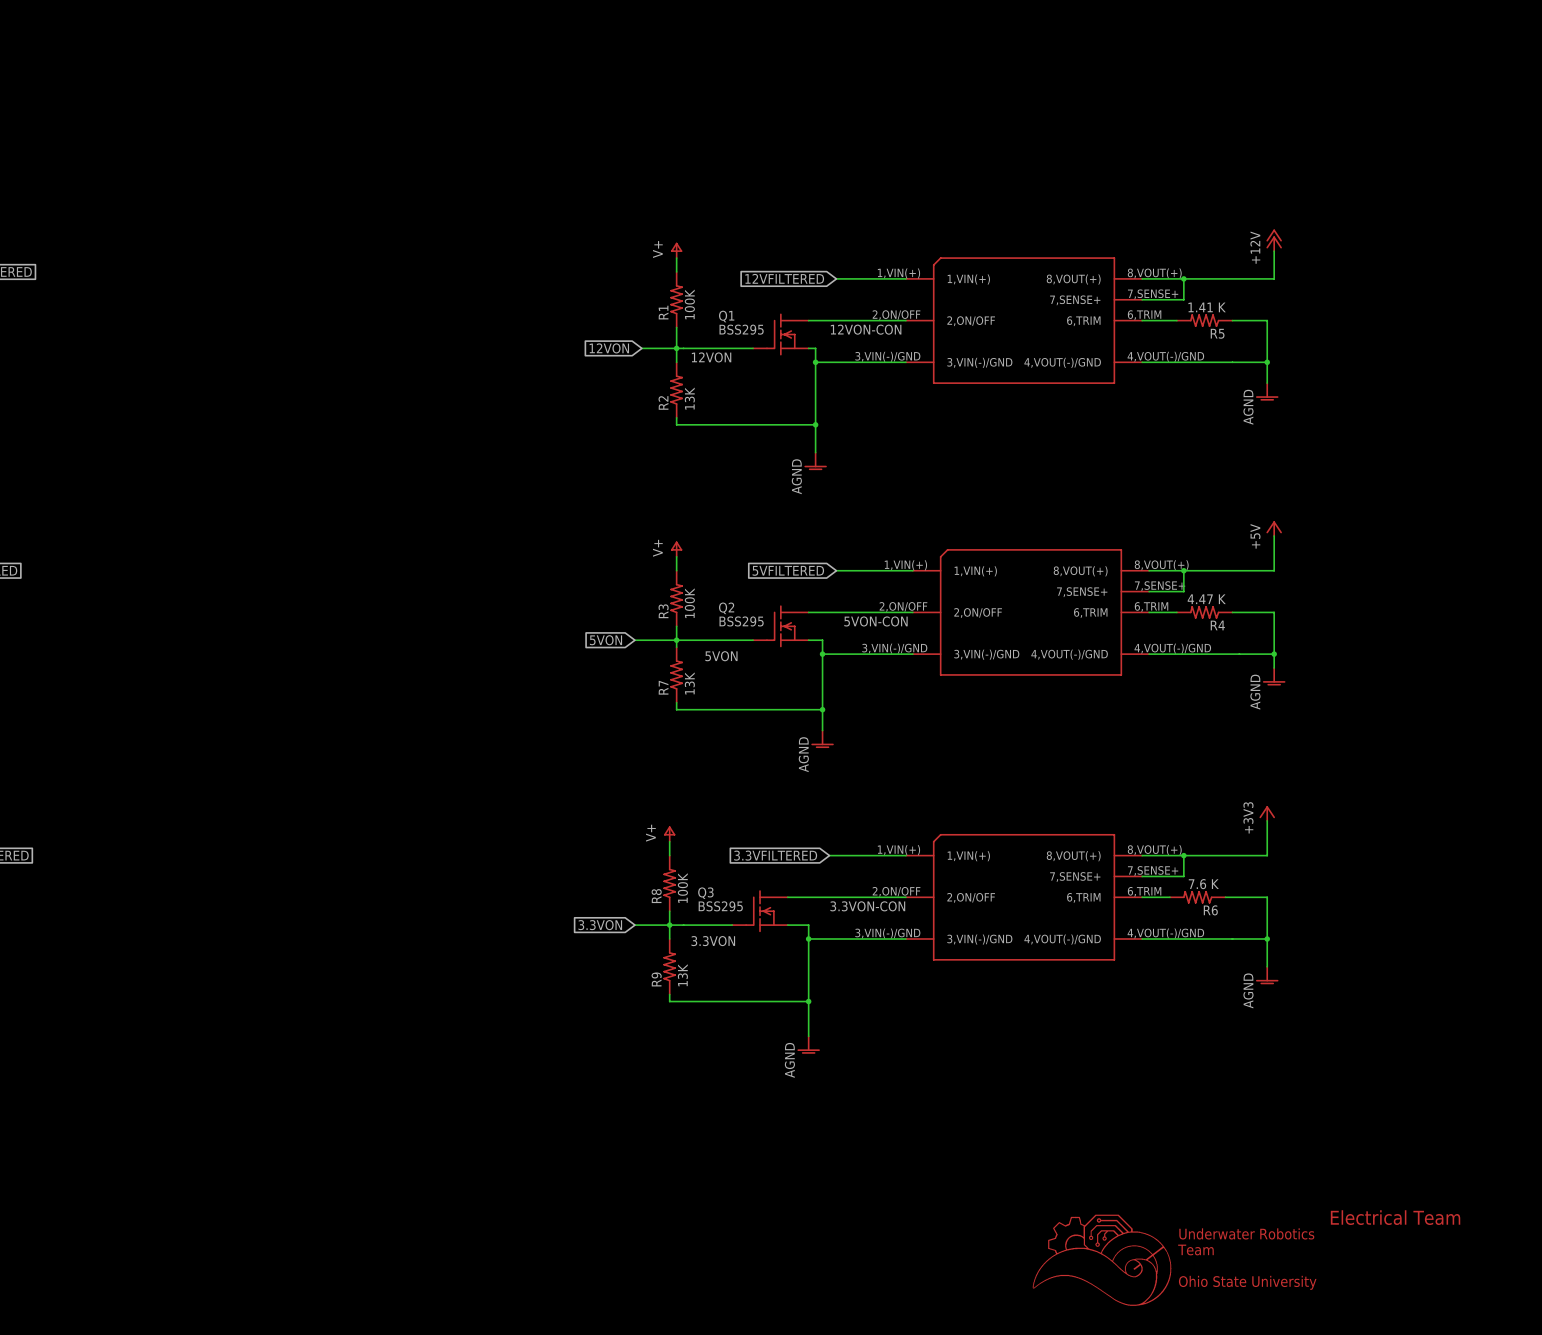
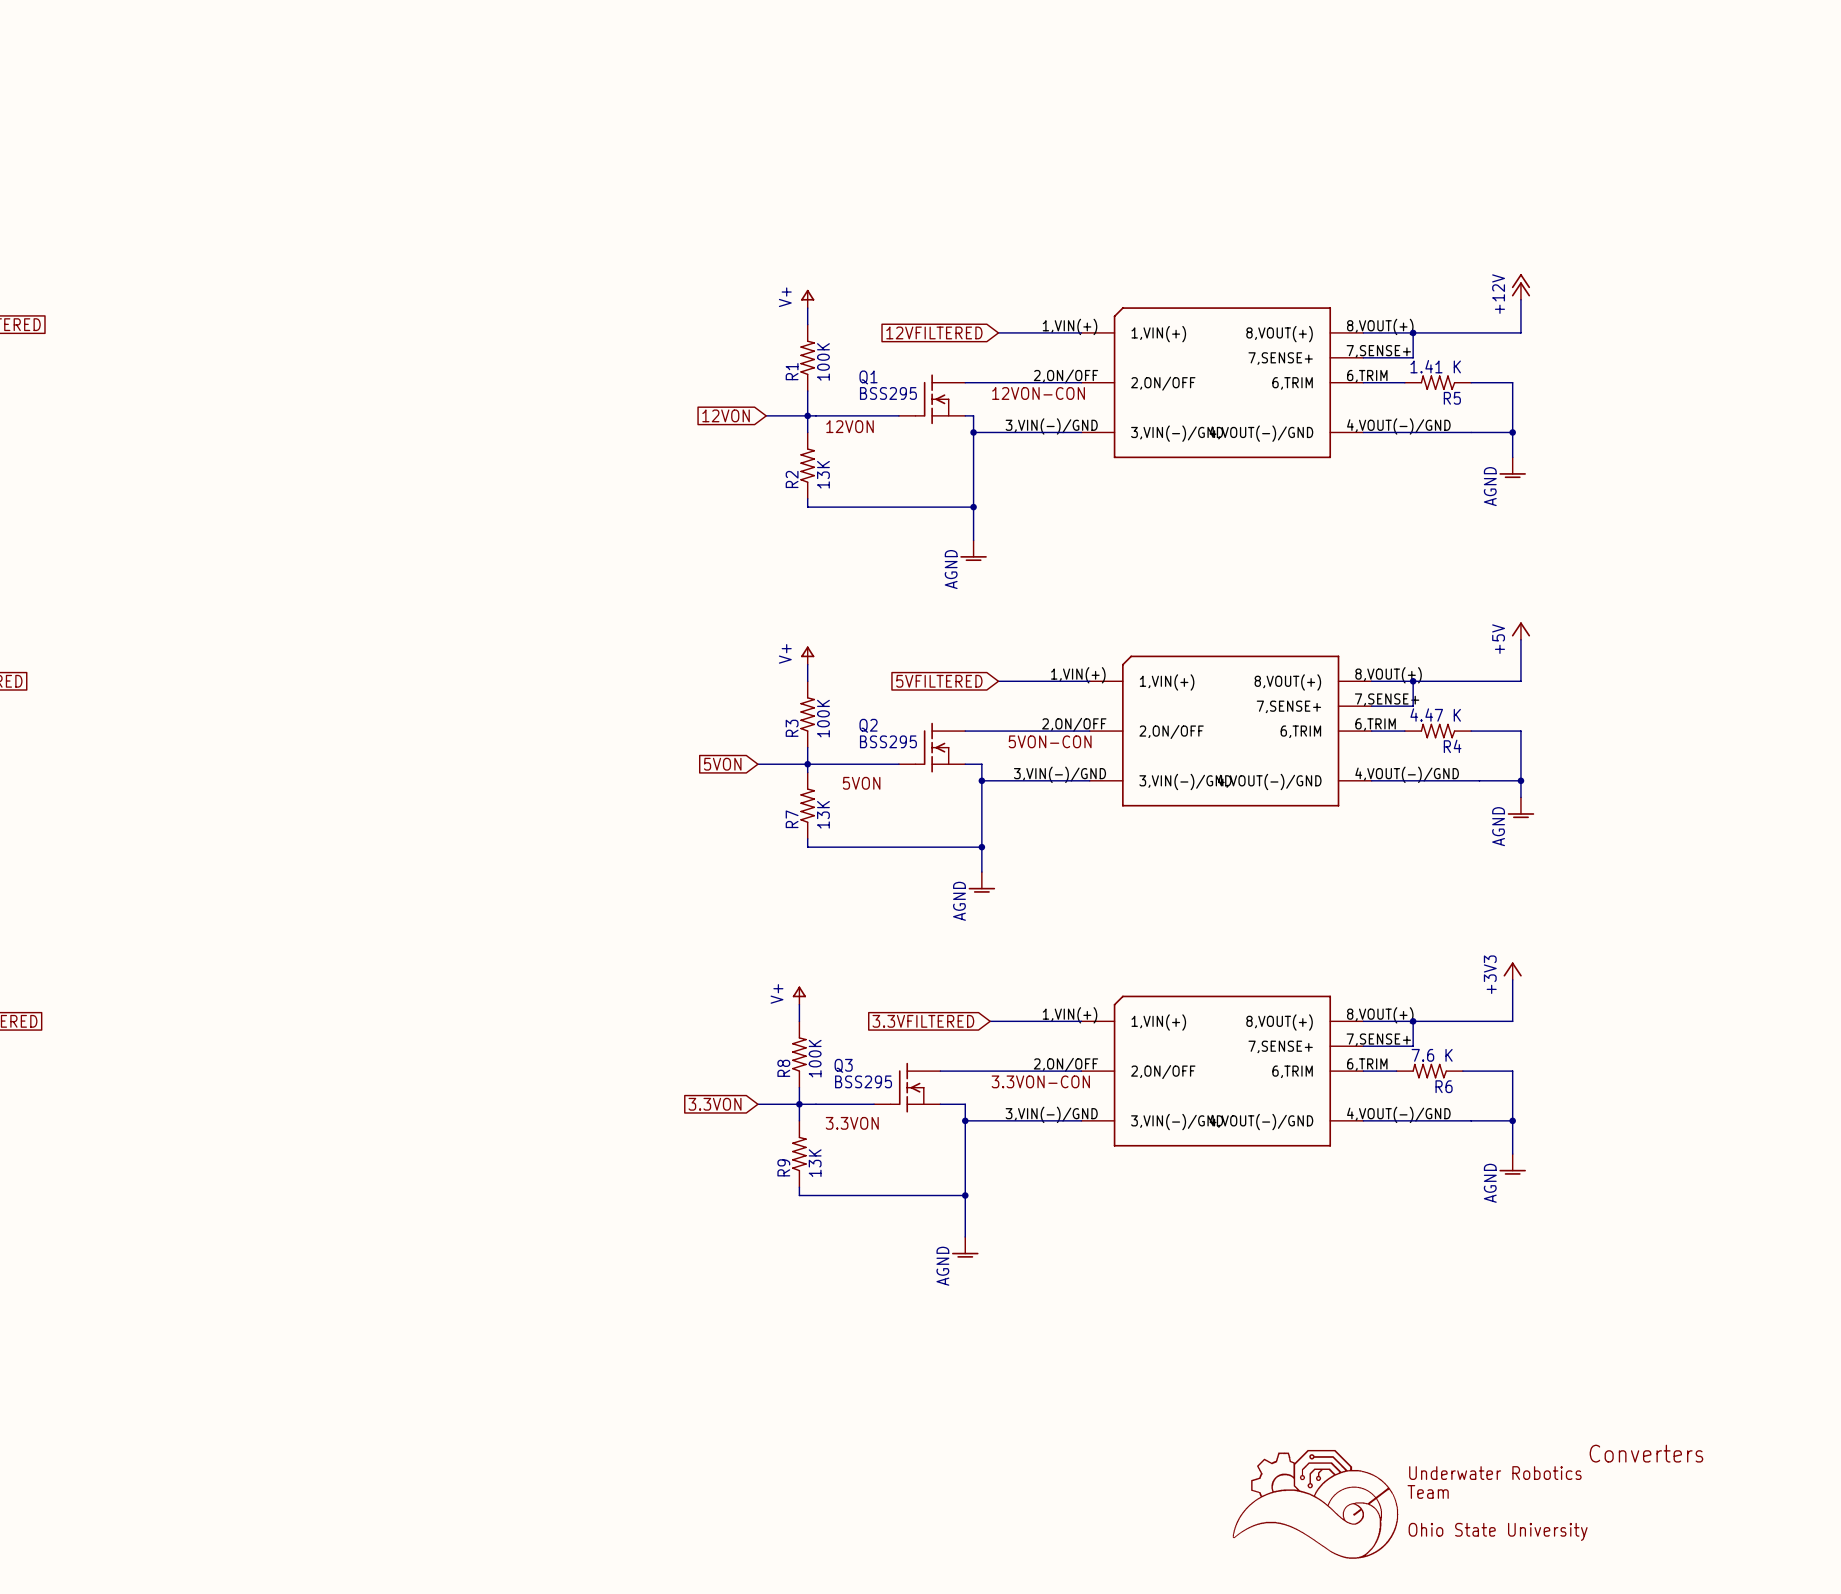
text: Electrical Team (1395, 1217) -> Converters (1646, 1453)

